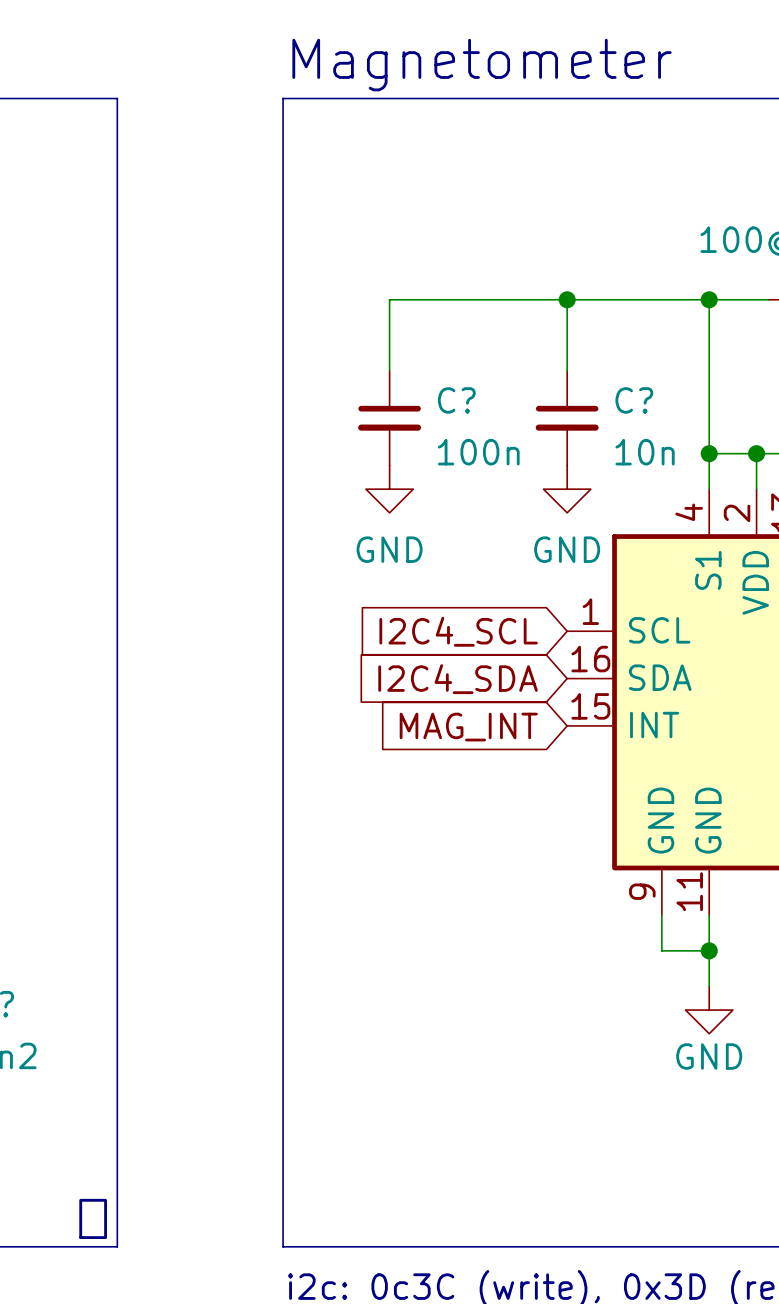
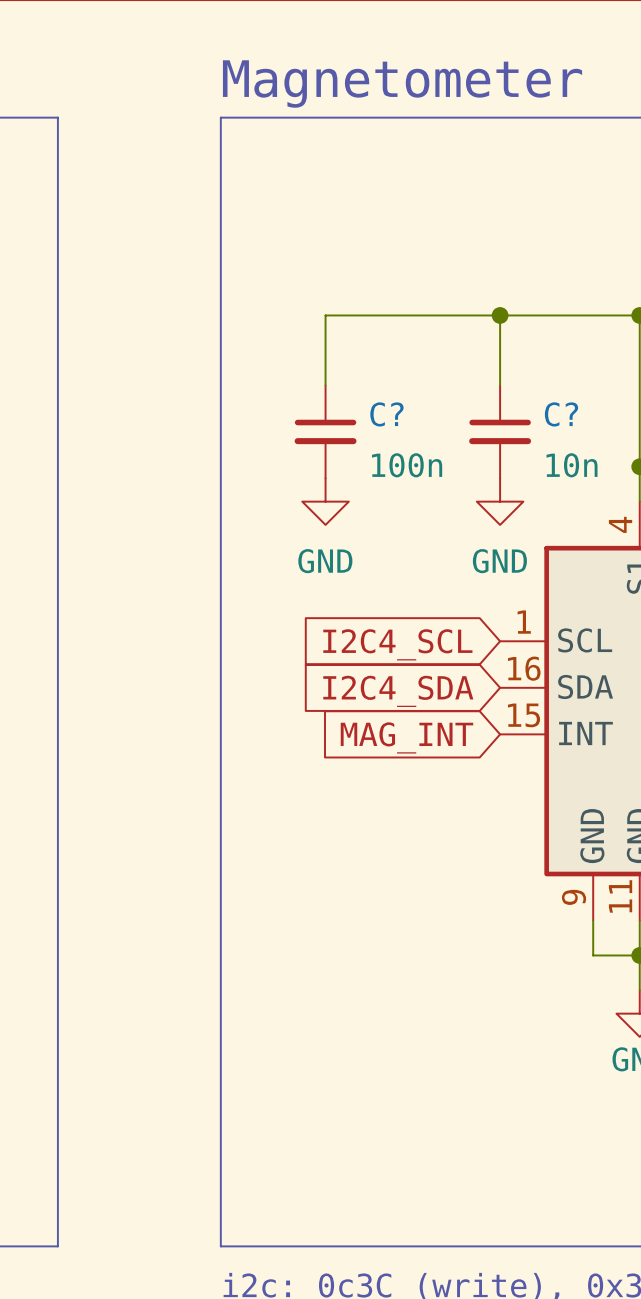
text: ✓ (93, 1218) -> none

